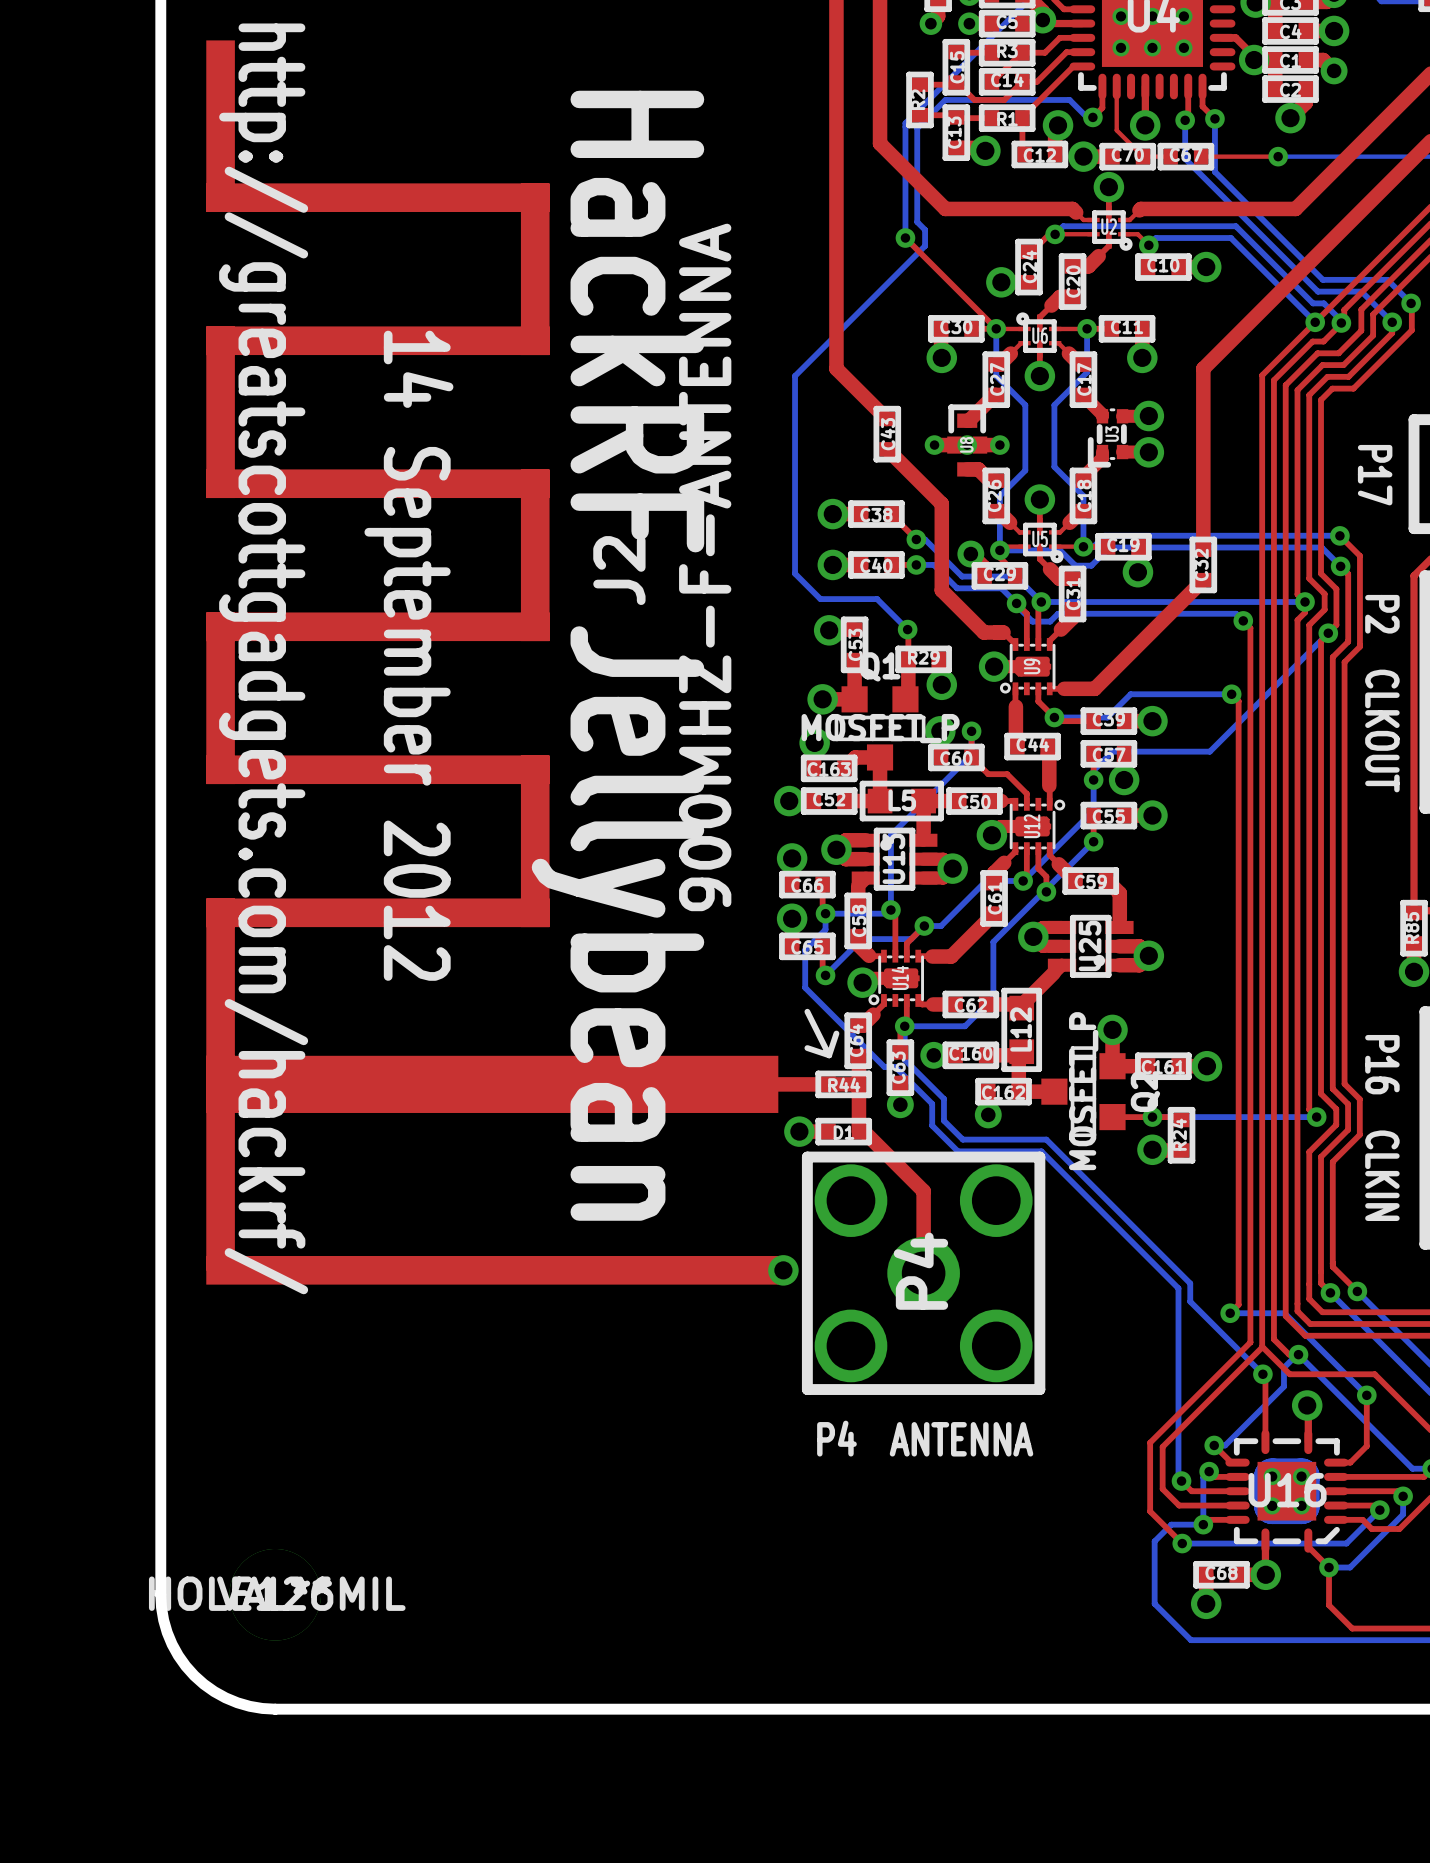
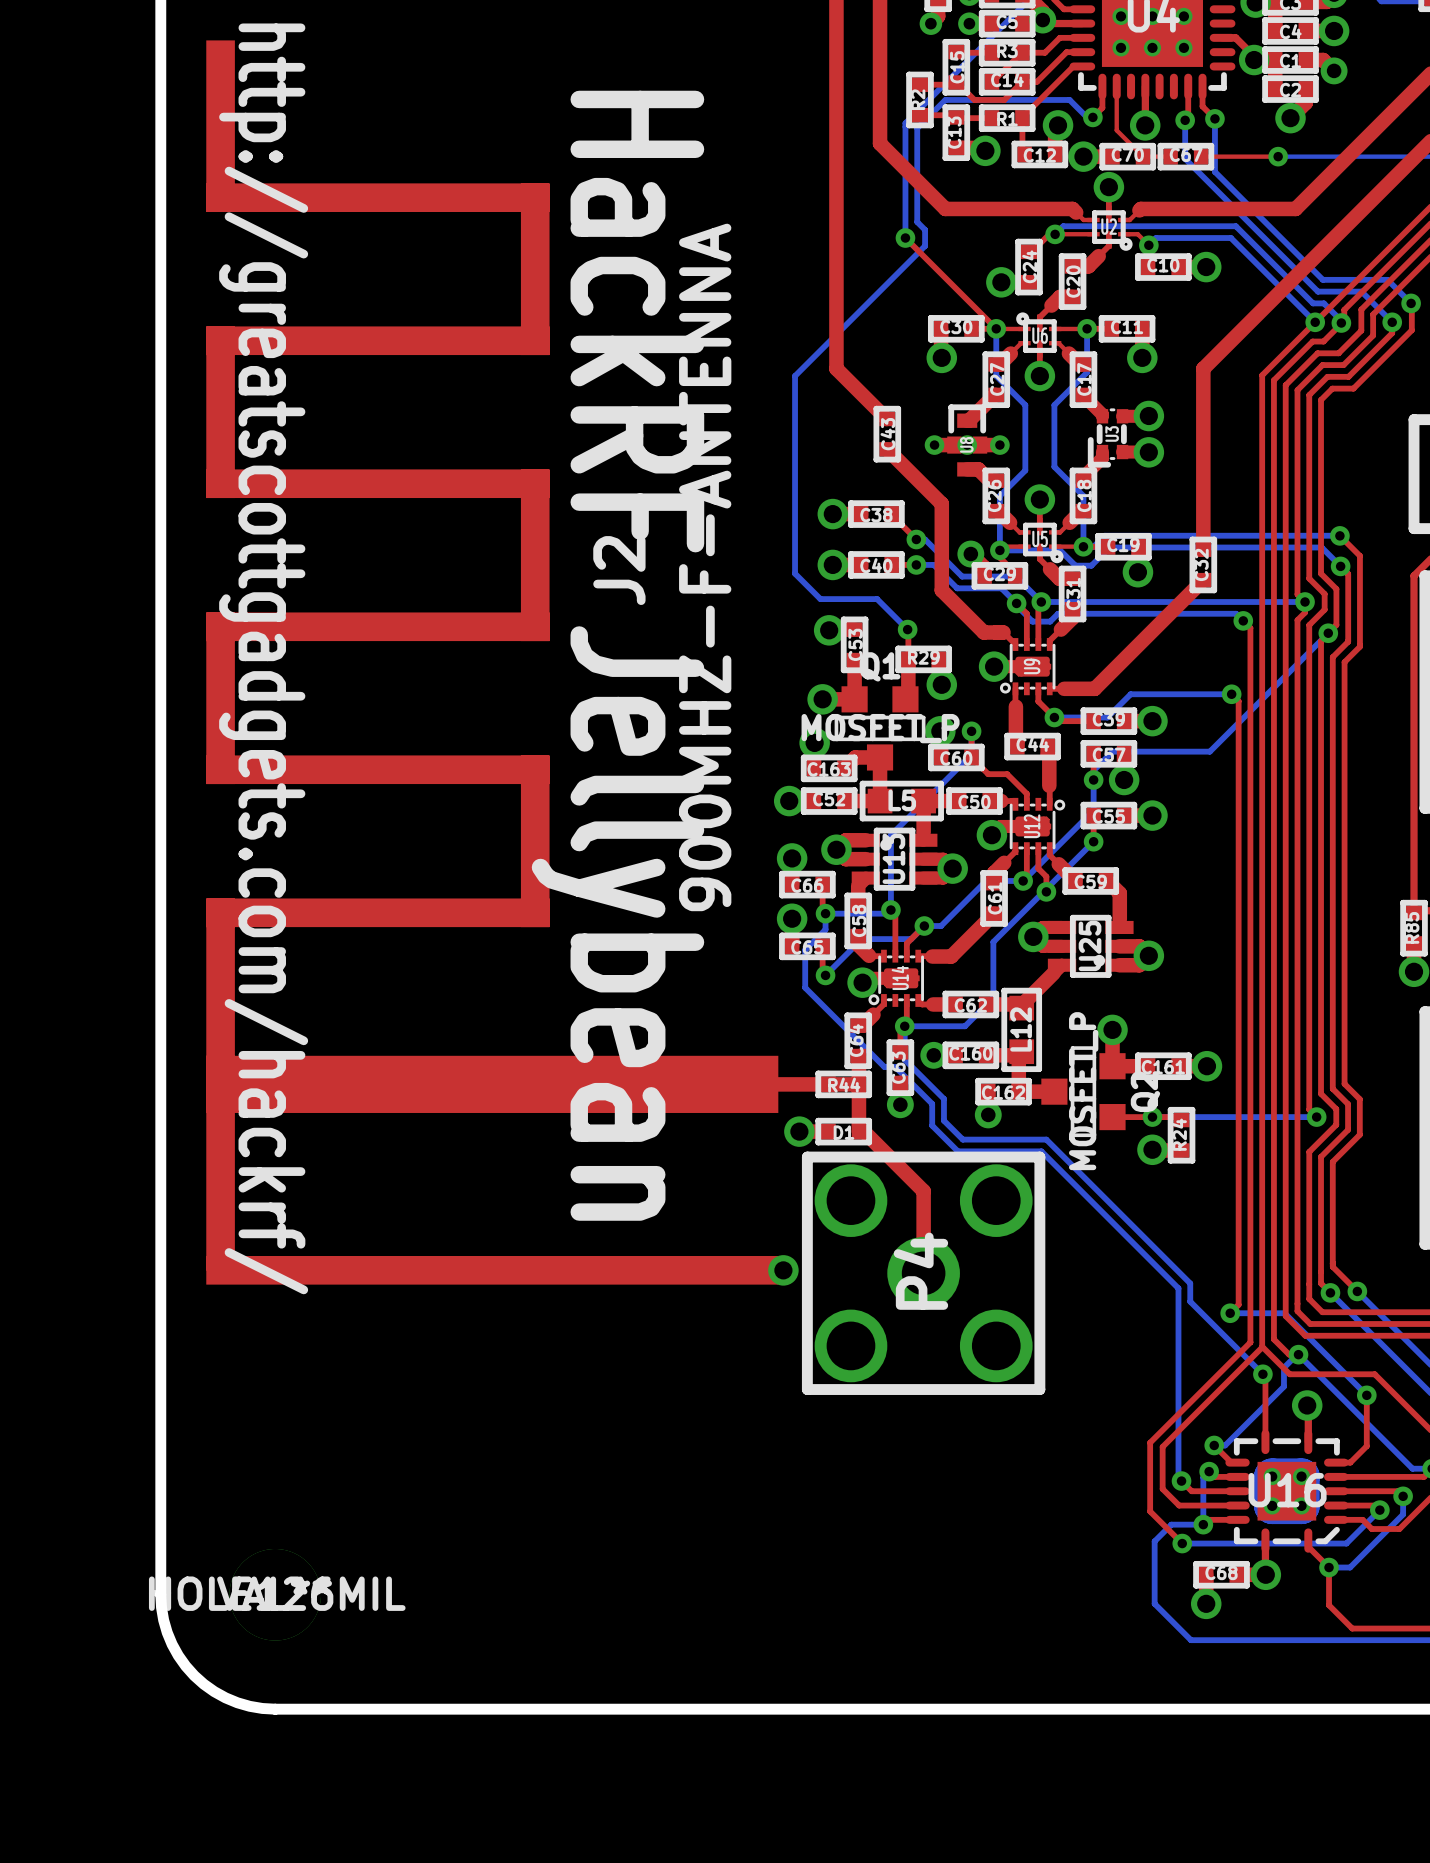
text: P17 (1375, 475) -> none
text: 14 September 2012 (408, 655) -> none
text: P2 CLKOUT (1382, 693) -> none
line: (807, 1011) (829, 1055) -> none
line: (836, 1033) (829, 1055) -> none
line: (807, 1048) (829, 1055) -> none
text: P16 CLKIN (1382, 1127) -> none
text: P4 ANTENNA (925, 1438) -> none

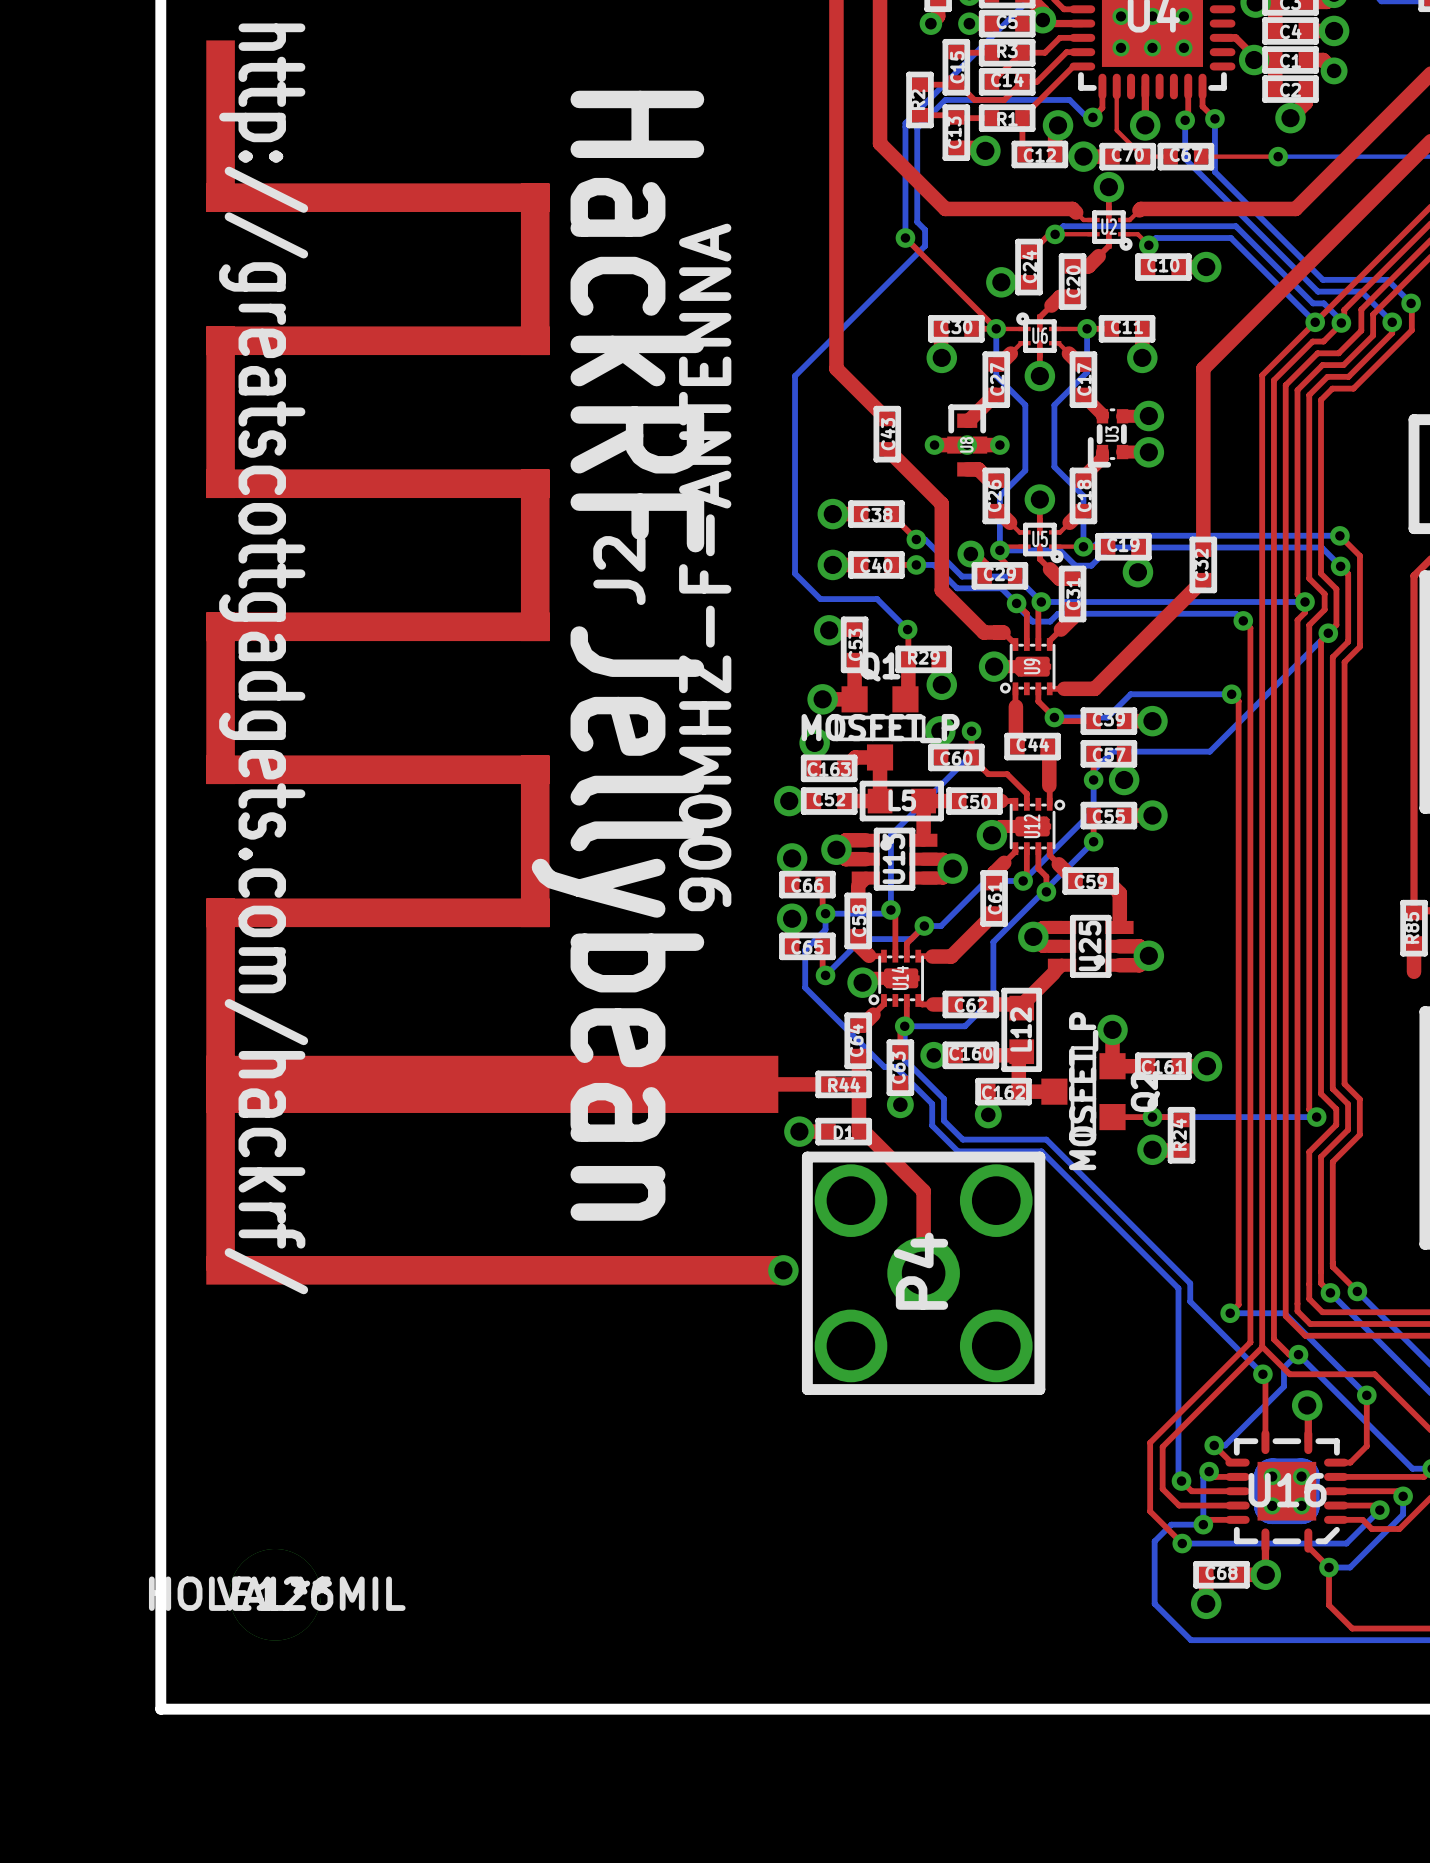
via: (1414, 971) -> none
board edge: (160, 1594) (163, 1620) (172, 1644) (194, 1675) (214, 1691) (237, 1702) (275, 1709) -> (160, 1594) (160, 1709) (275, 1709)

